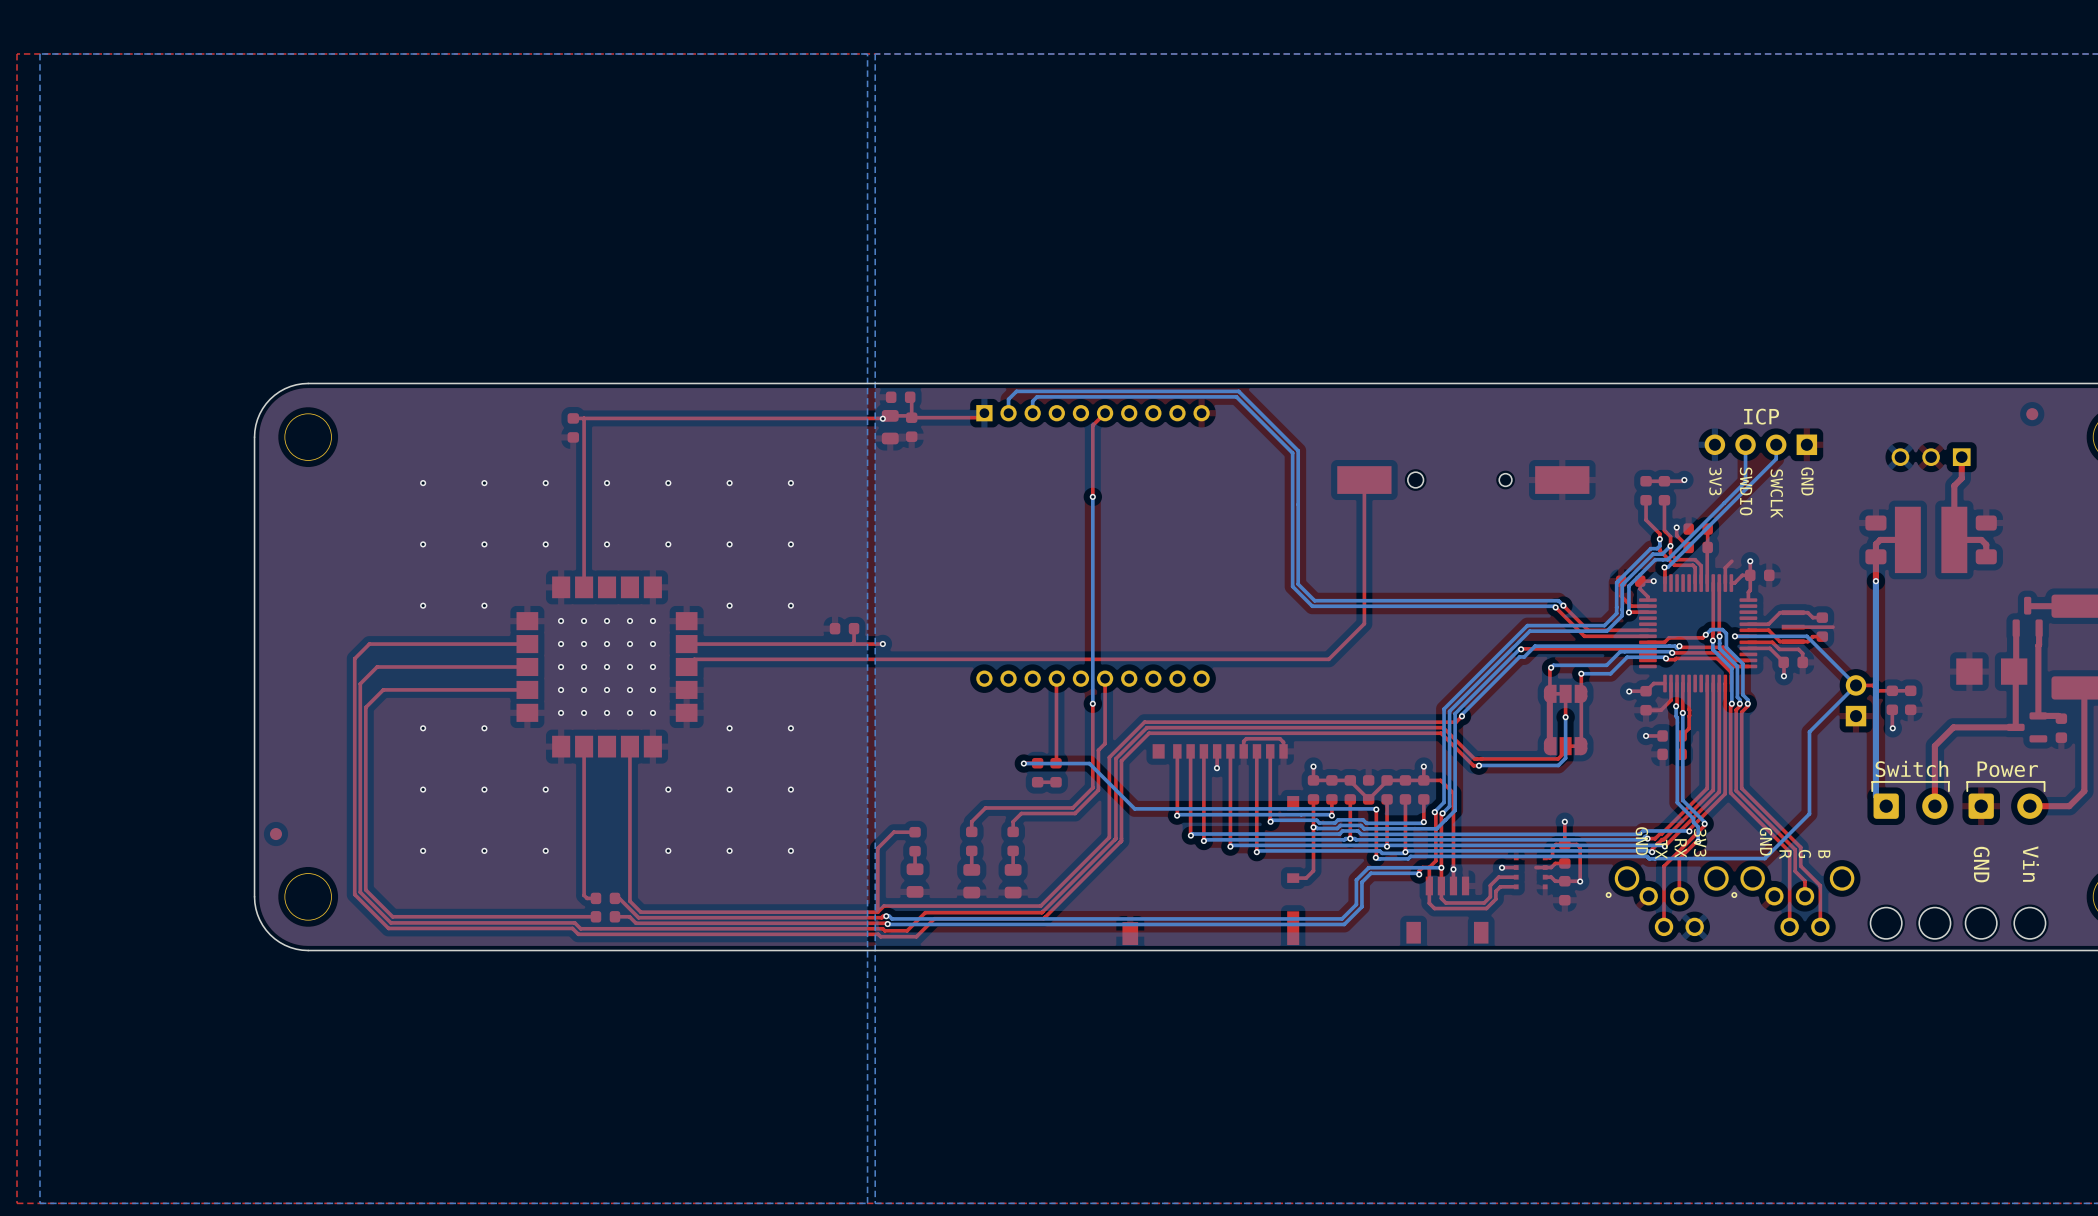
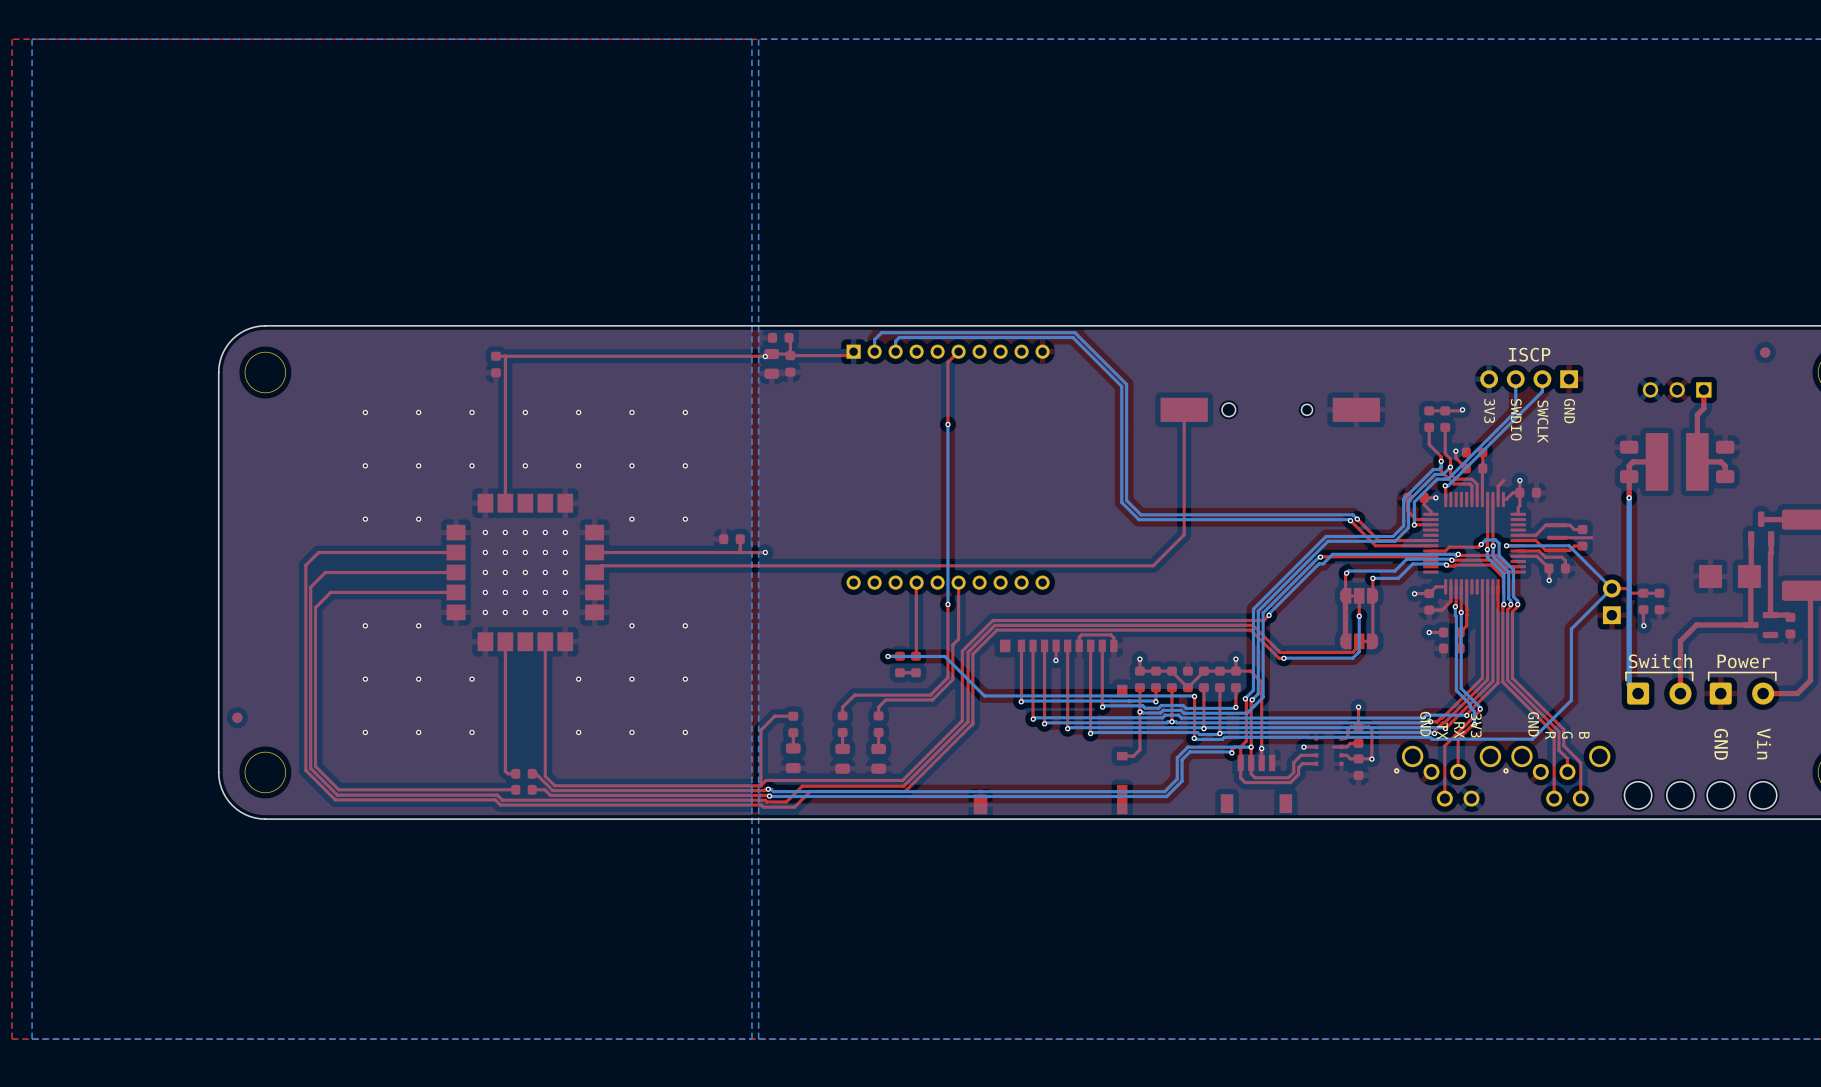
text: ICP (1761, 416) -> ISCP (1529, 354)

